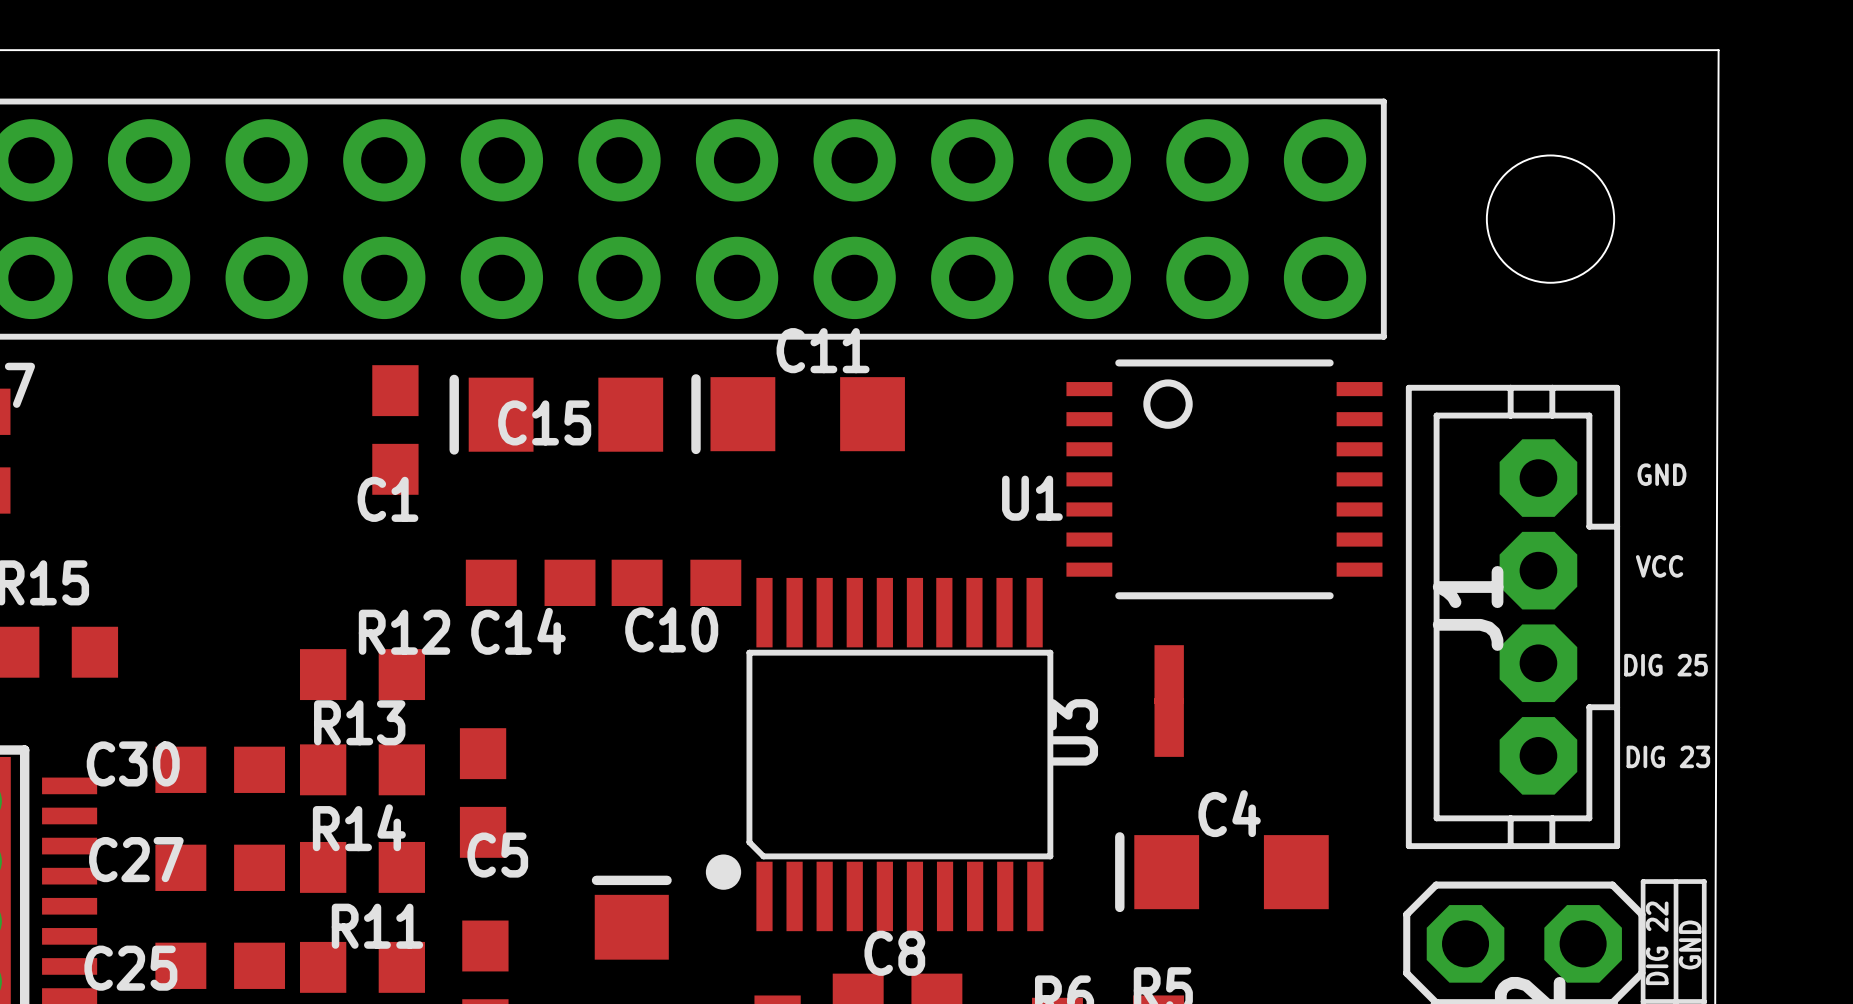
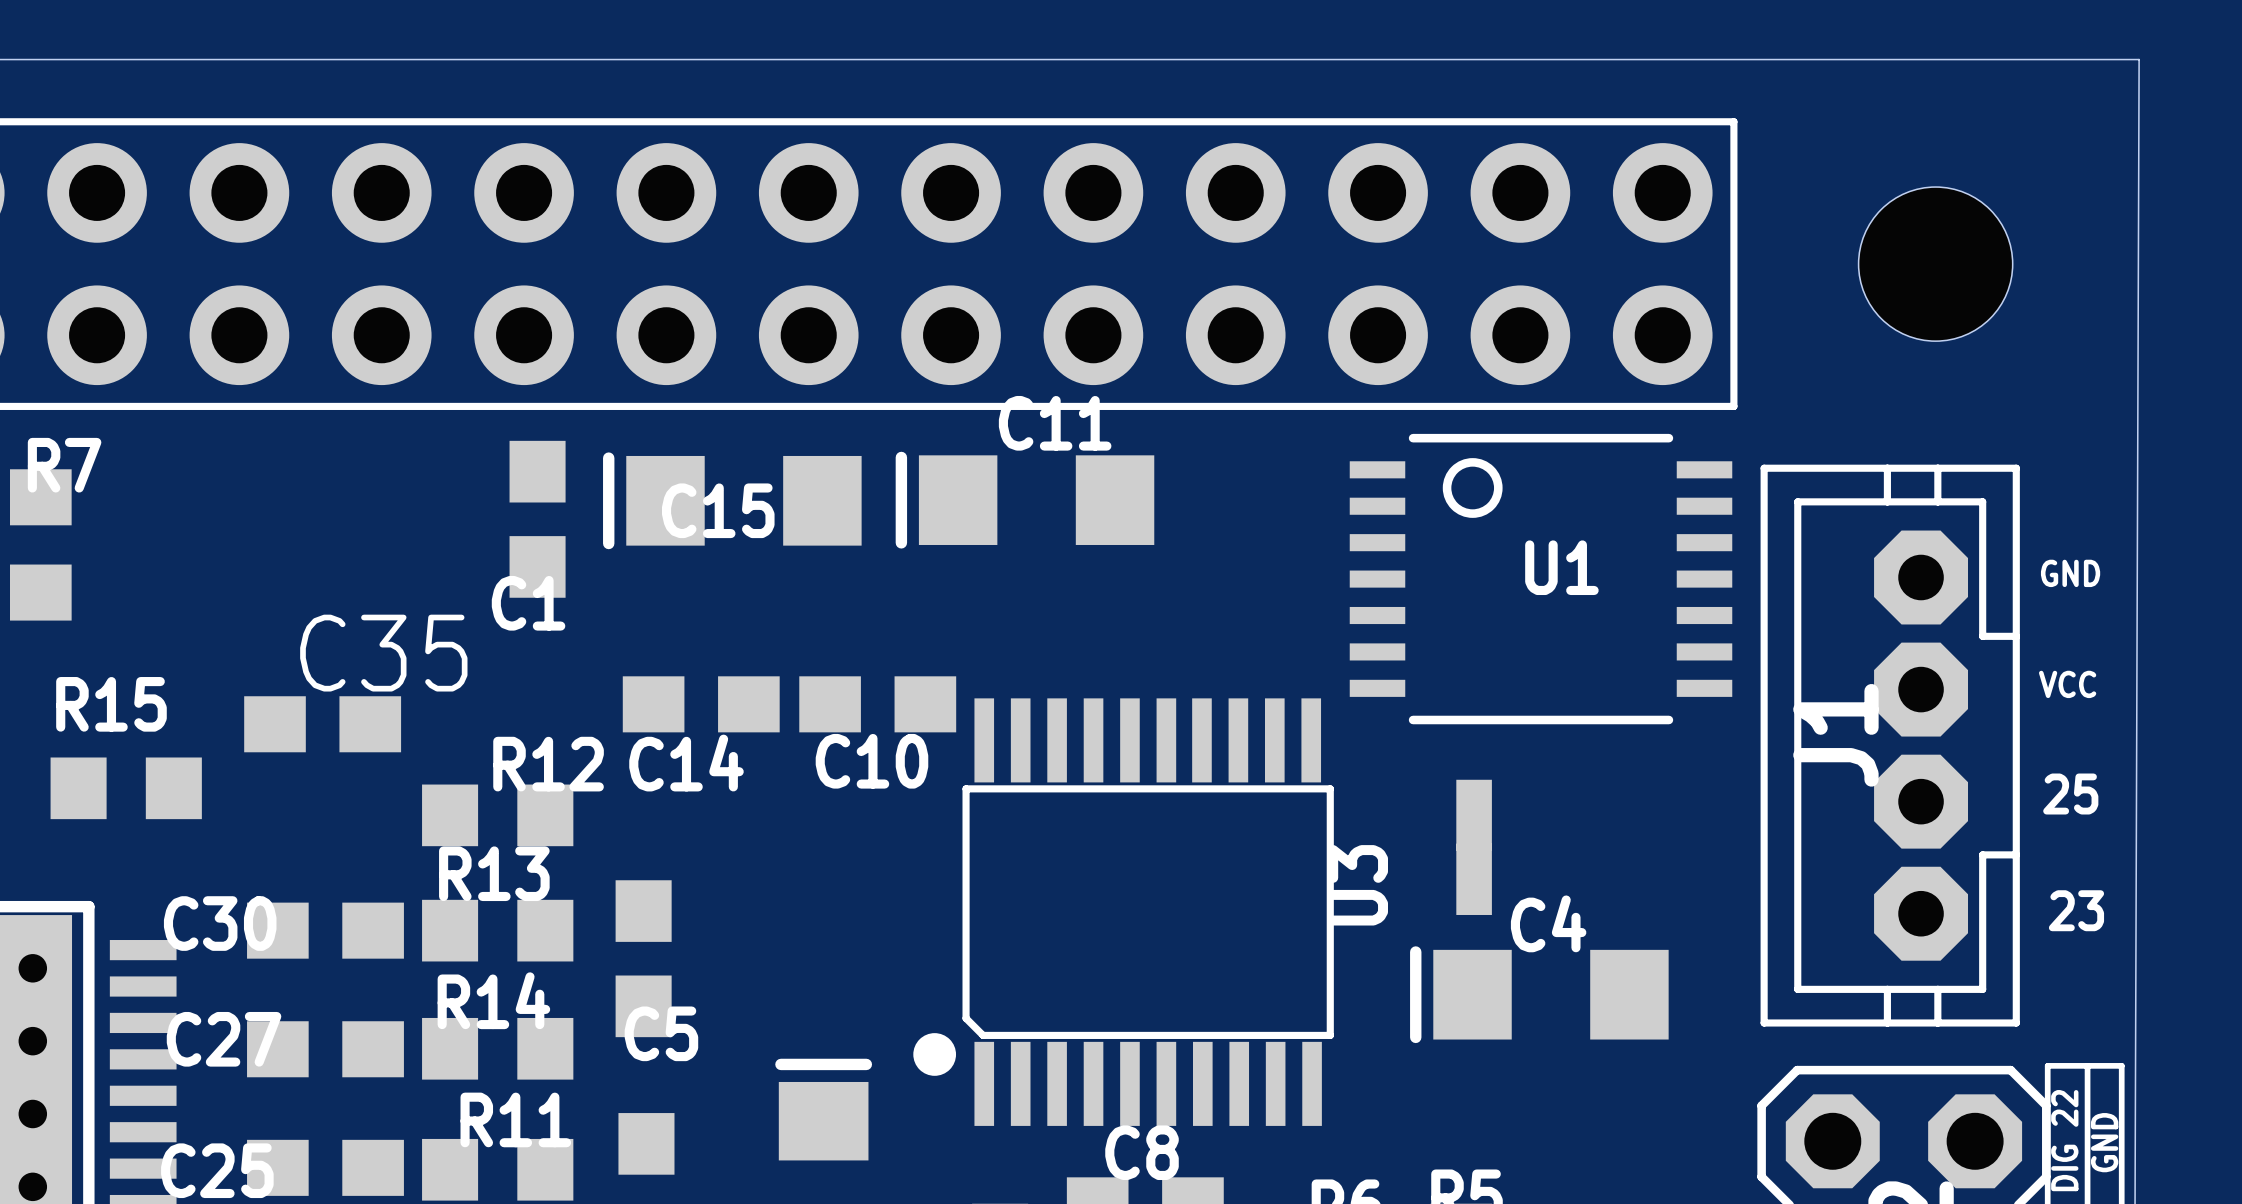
U1 name position: U1 (1032, 498) -> U1 (1561, 567)
C35: none -> (322, 724)
text: DIG 25 (1666, 665) -> 25 (2070, 794)
text: DIG 23 (1668, 756) -> 23 (2076, 910)
C4 position: (1221, 872) -> (1539, 994)

